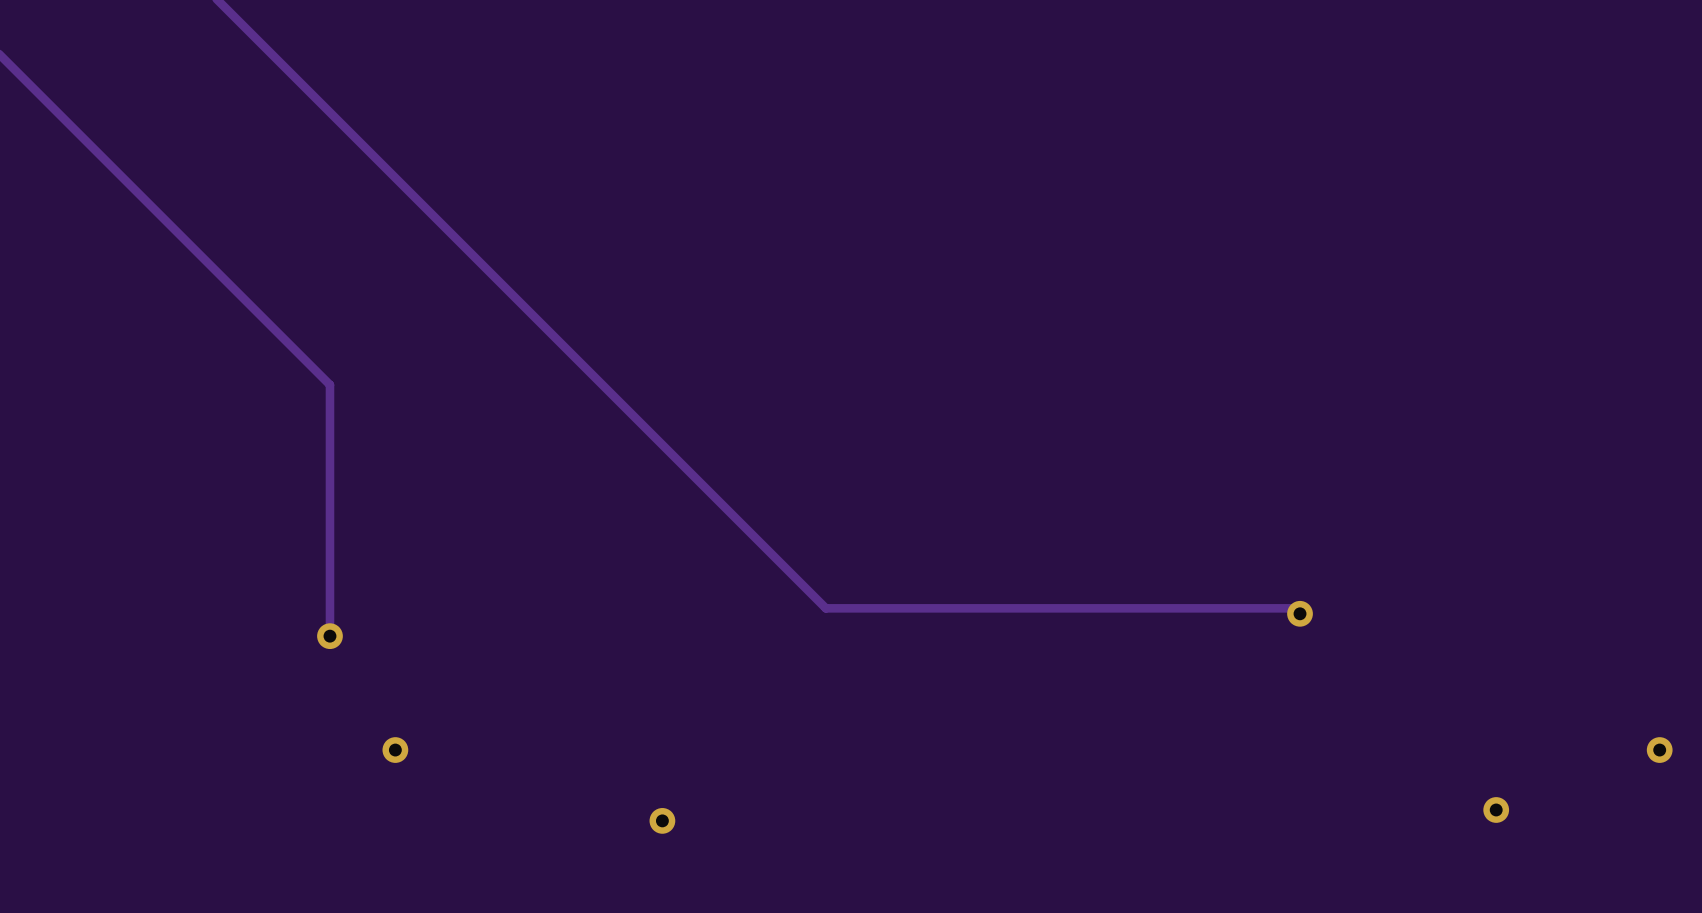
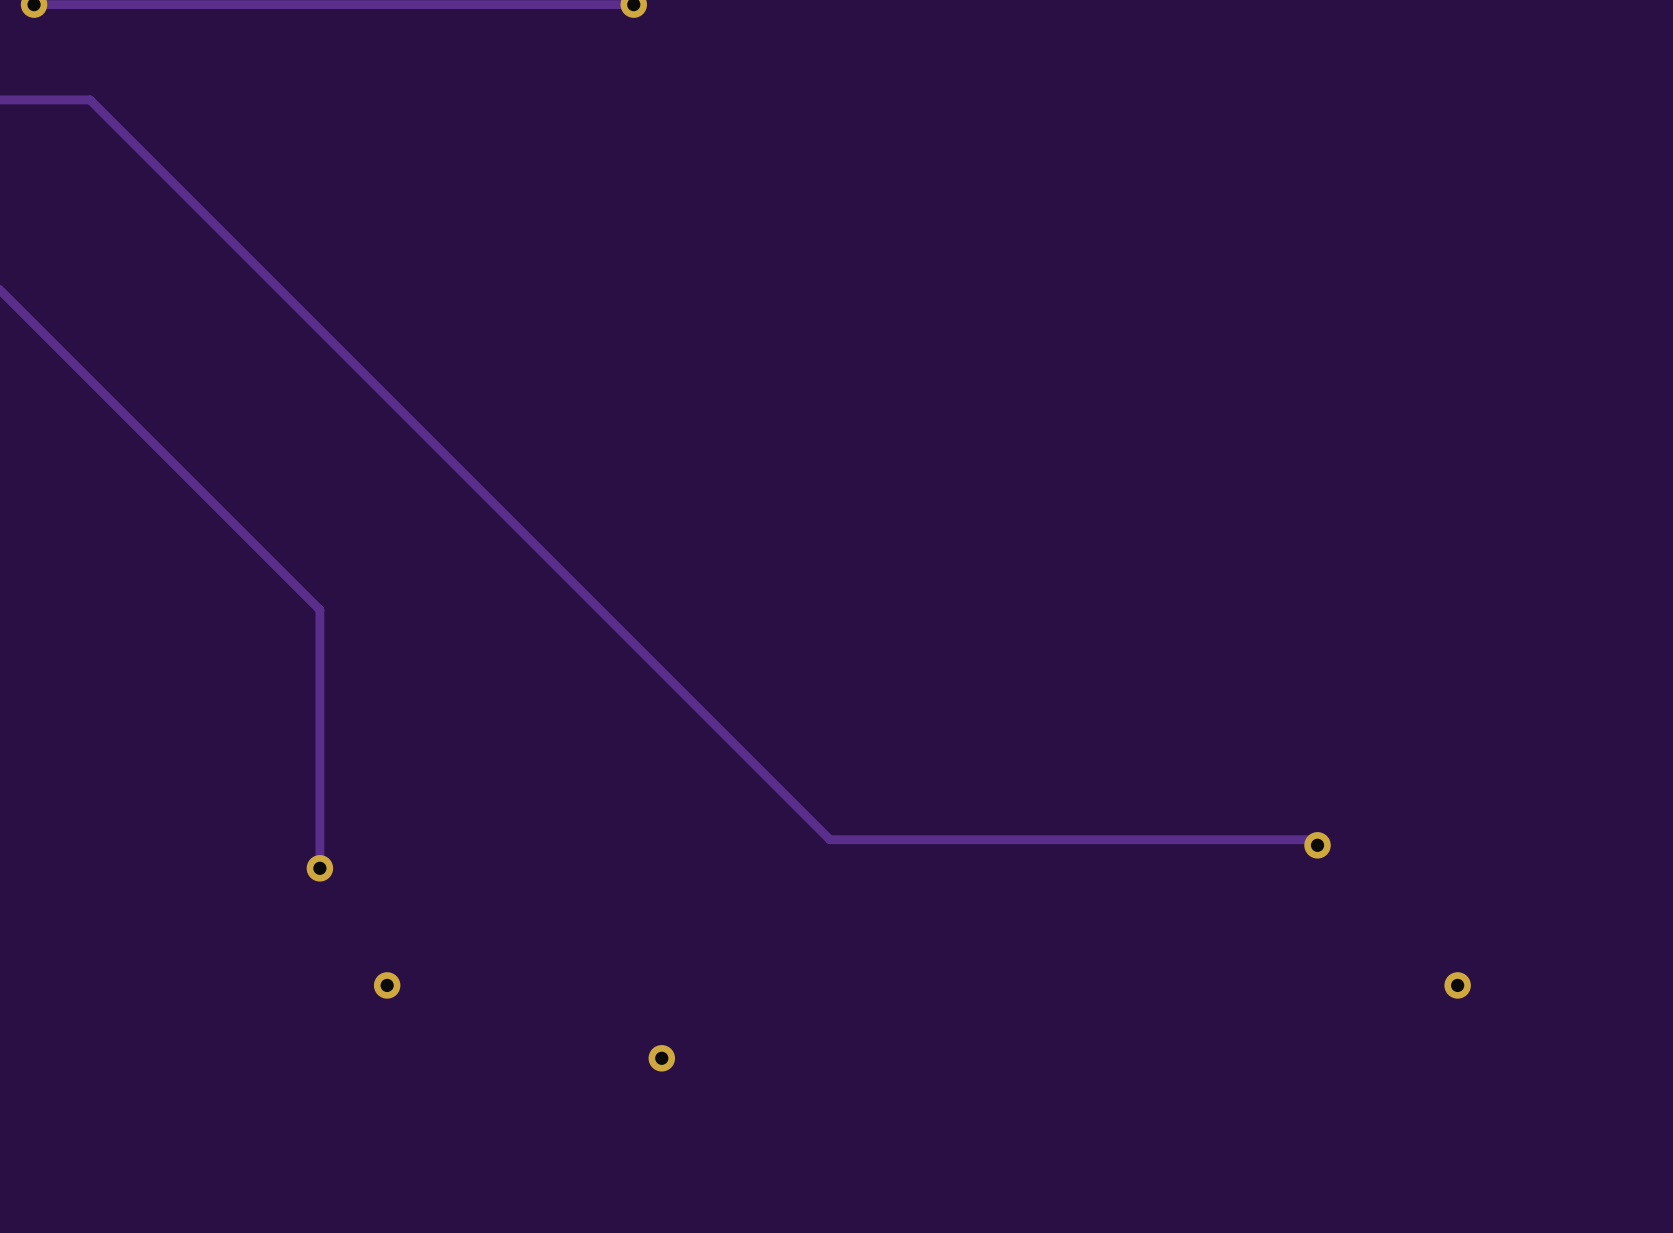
via position: (1496, 809) -> (1457, 985)

